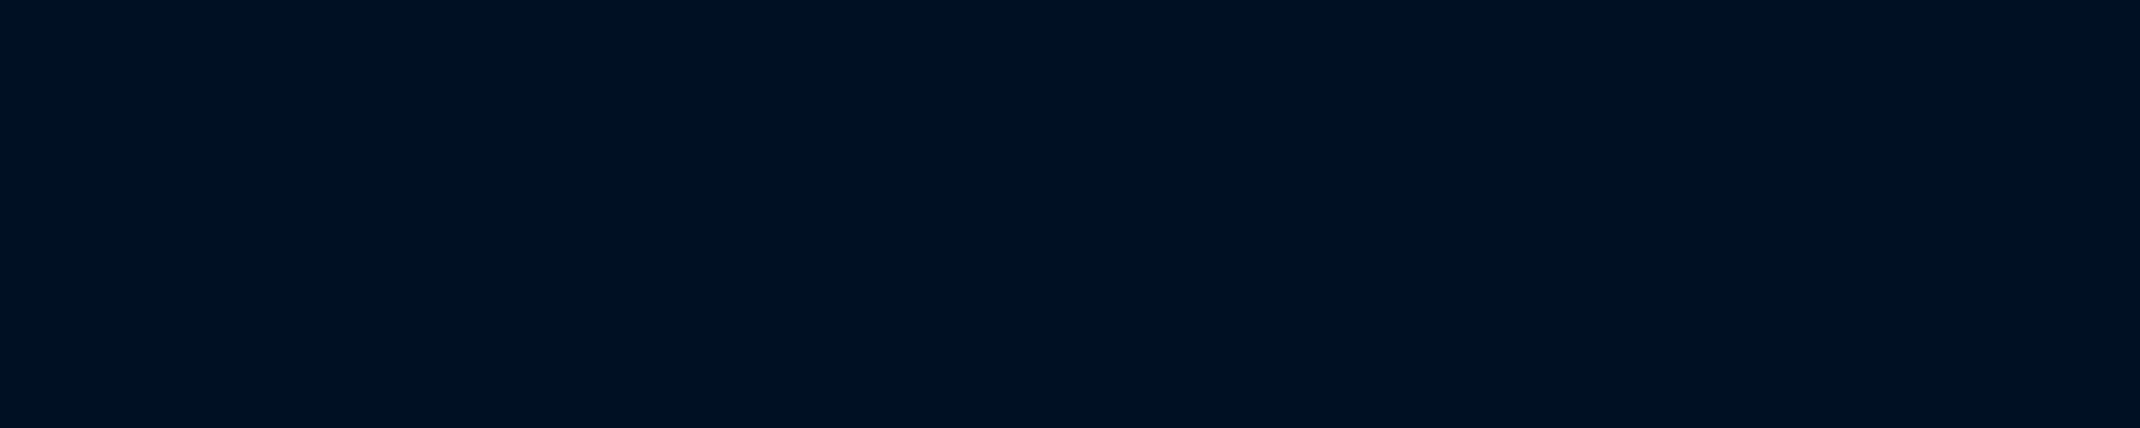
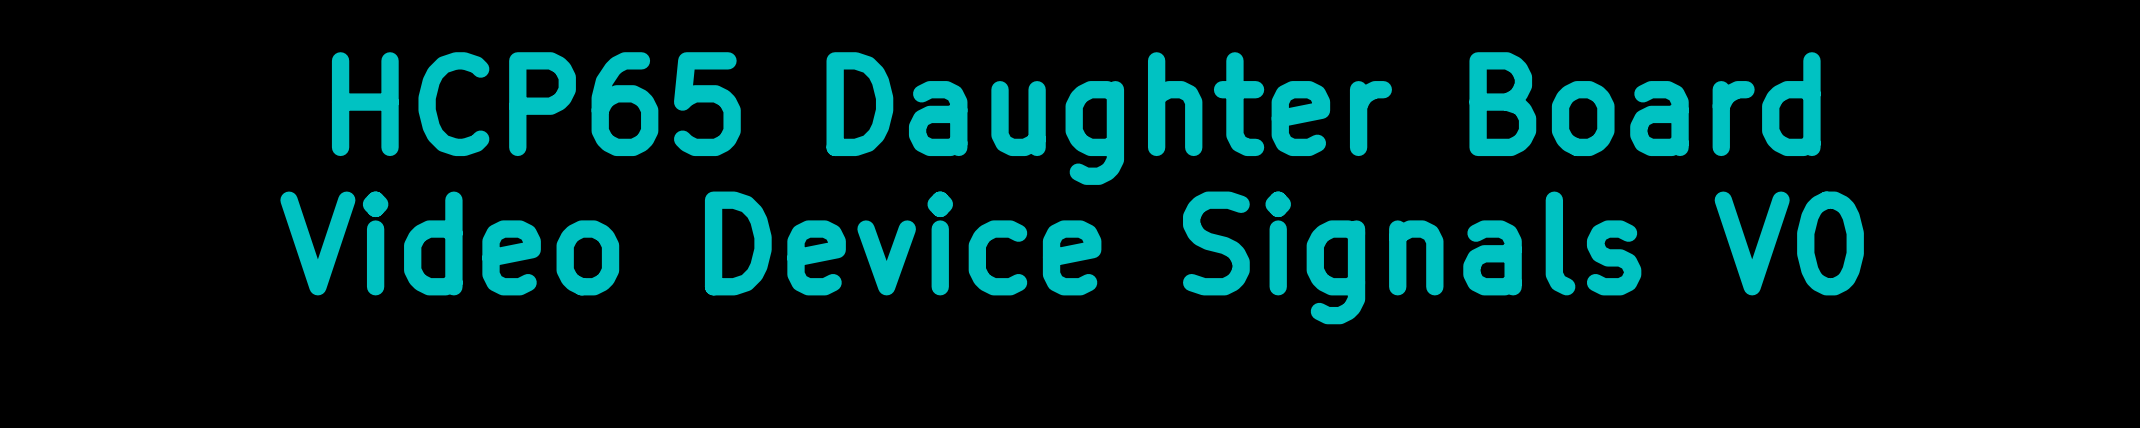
text: none -> HCP65 Daughter Board (1076, 118)
text: none -> Video Device Signals V0 (1072, 257)

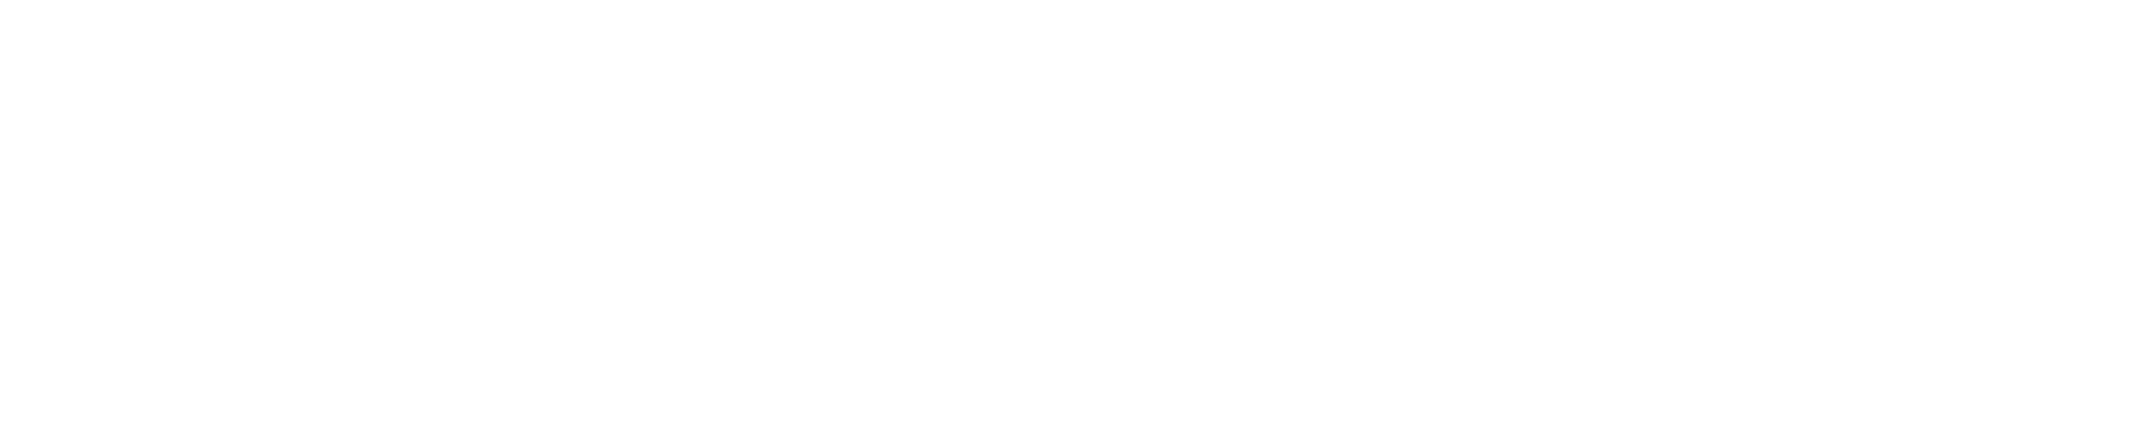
text: HCP65 Daughter Board (1076, 118) -> none
text: Video Device Signals V0 (1072, 257) -> none

